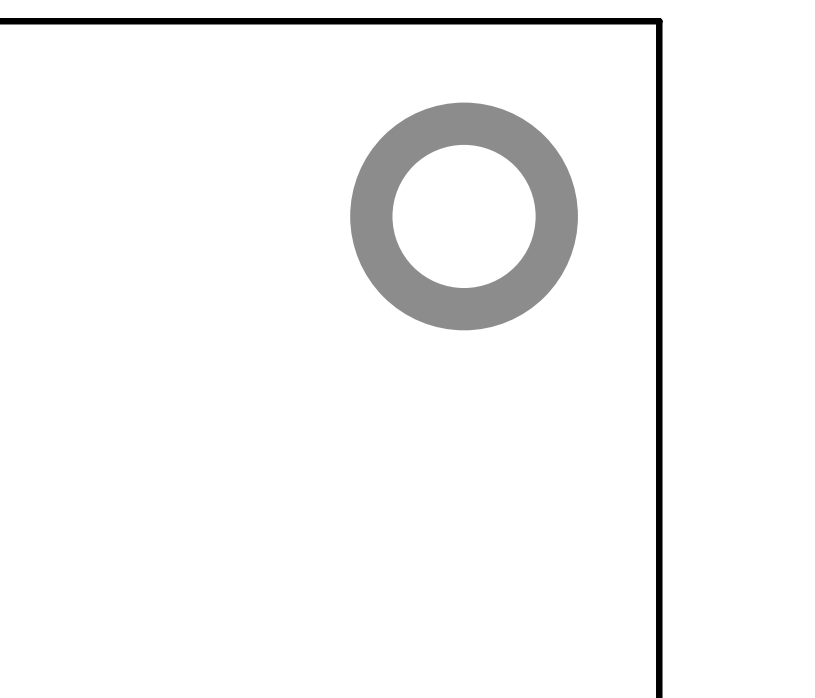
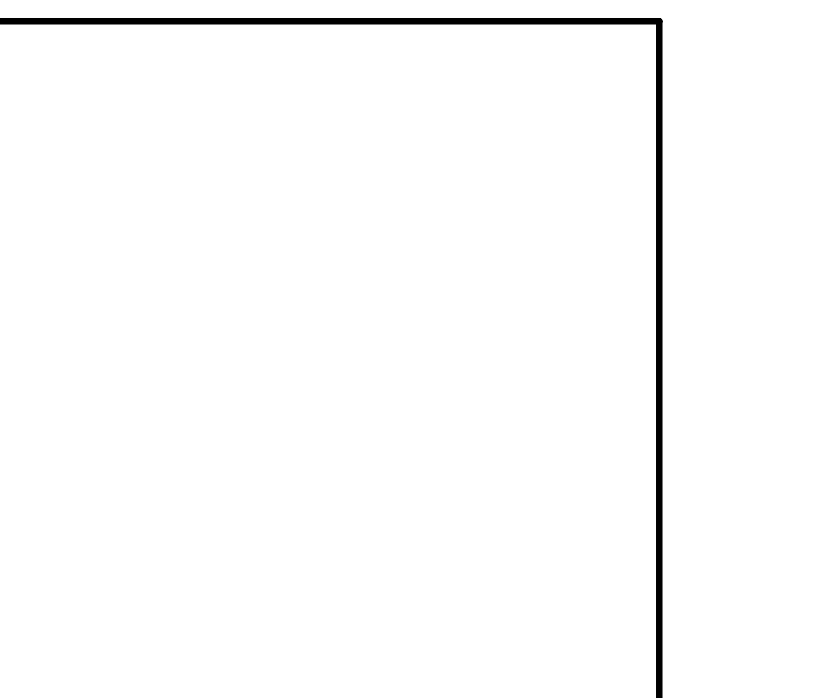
part: (464, 216) -> none

